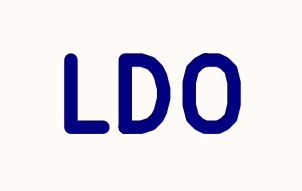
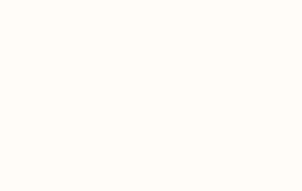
text: LDO (152, 93) -> none

